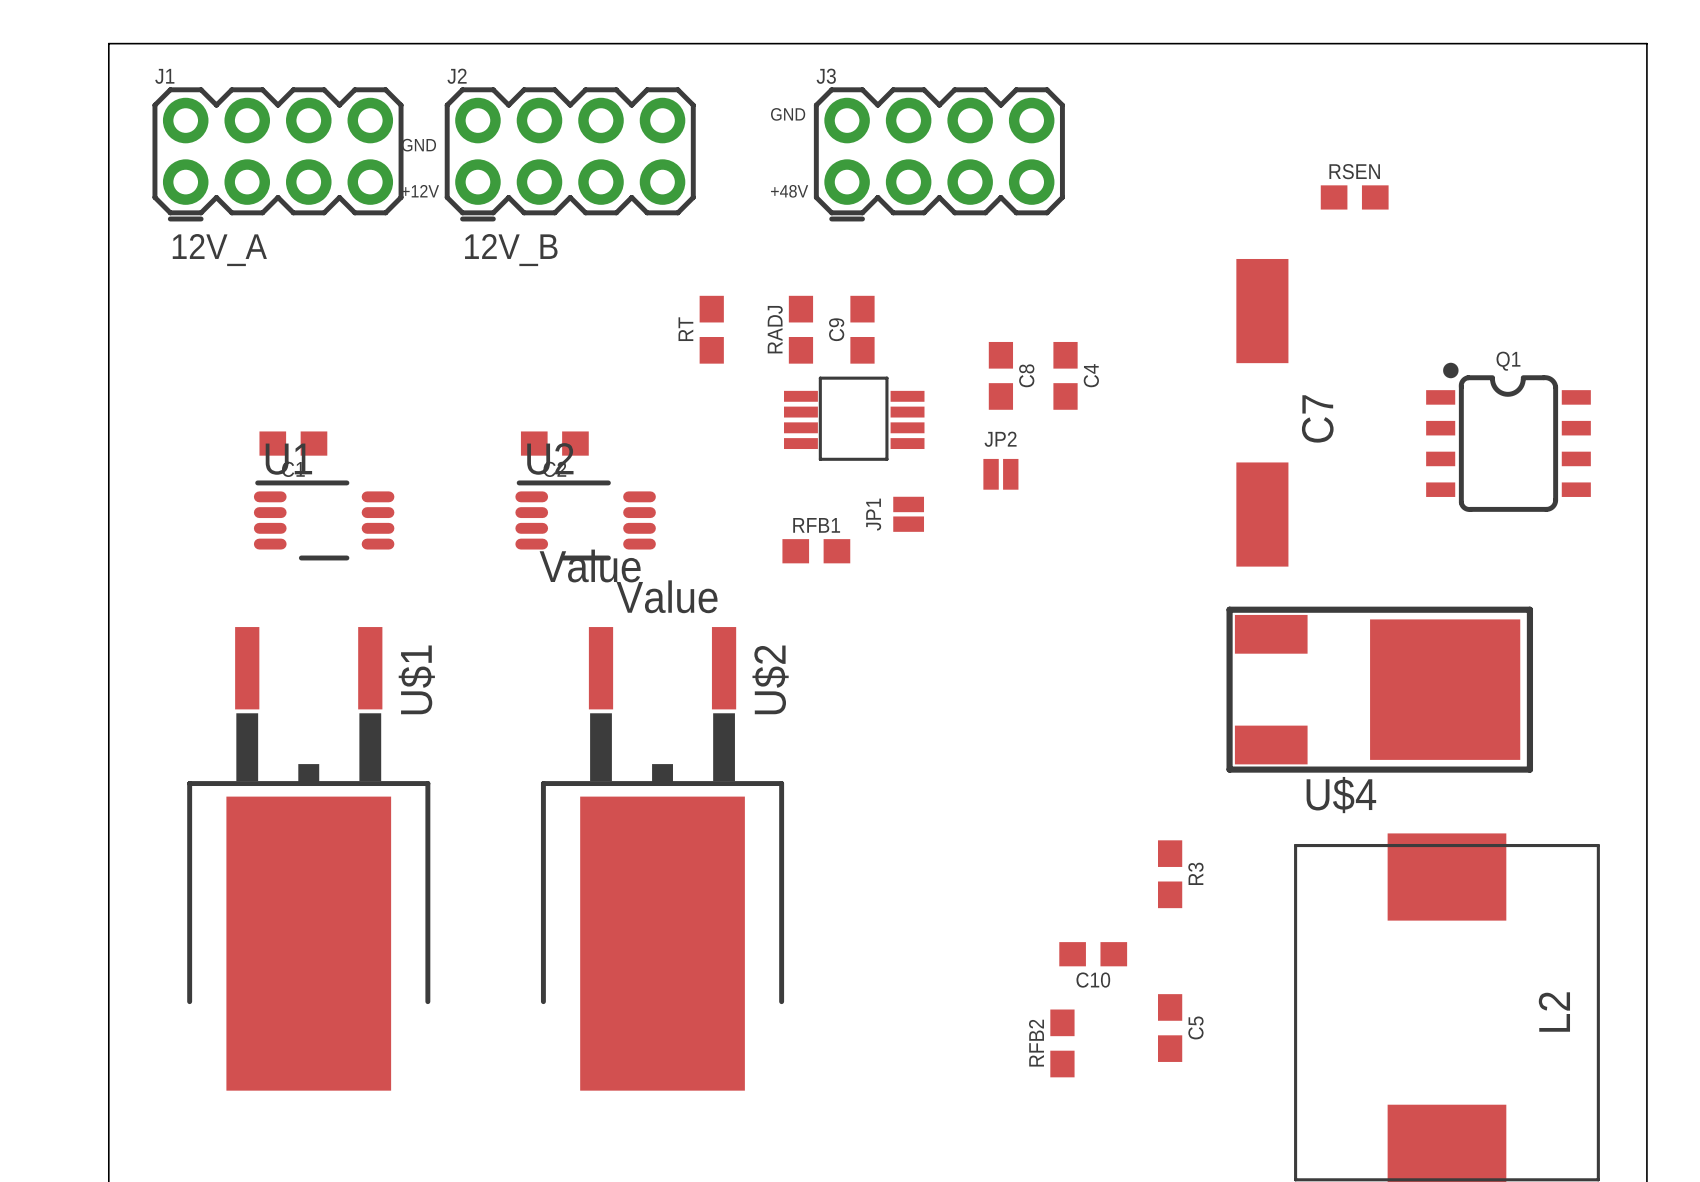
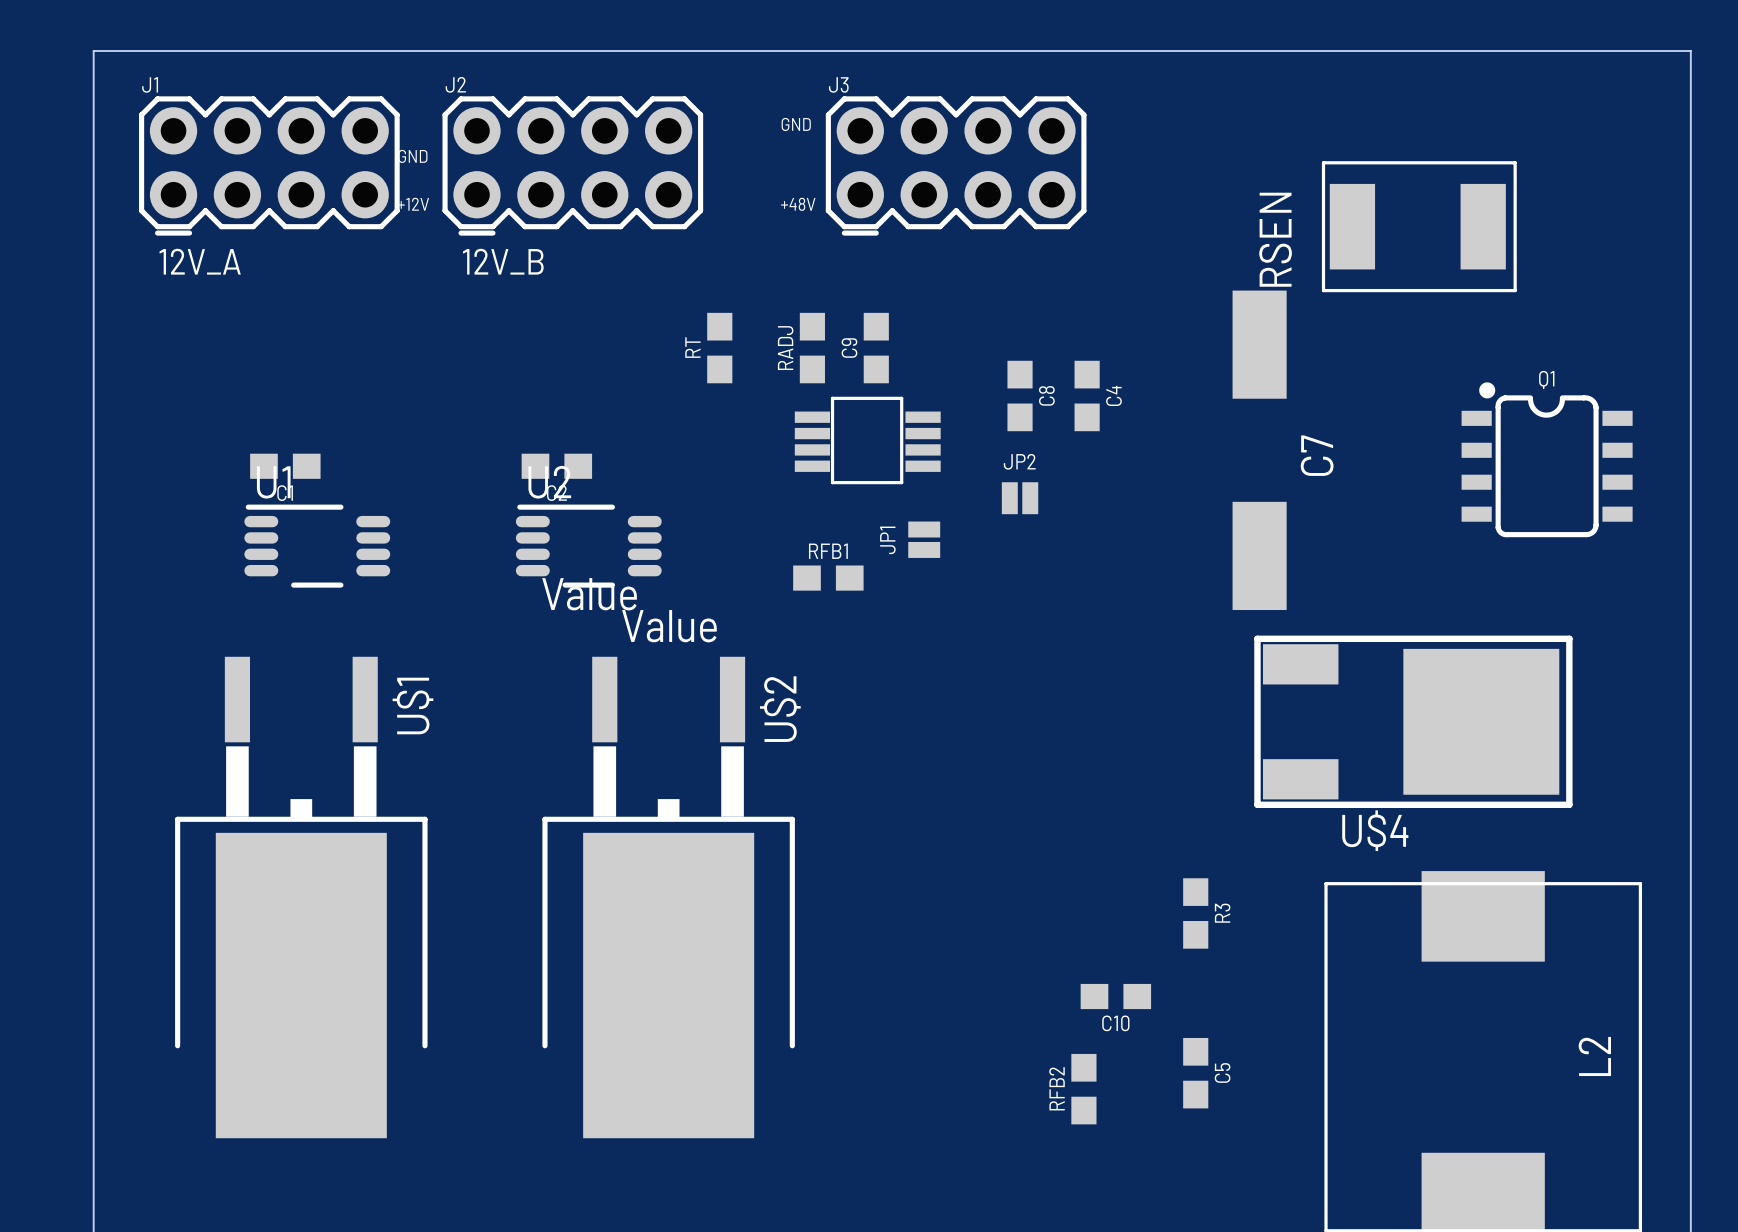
RSEN: (1354, 197) -> none
RSEN: none -> (1419, 226)
C7 position: (1262, 412) -> (1259, 450)

